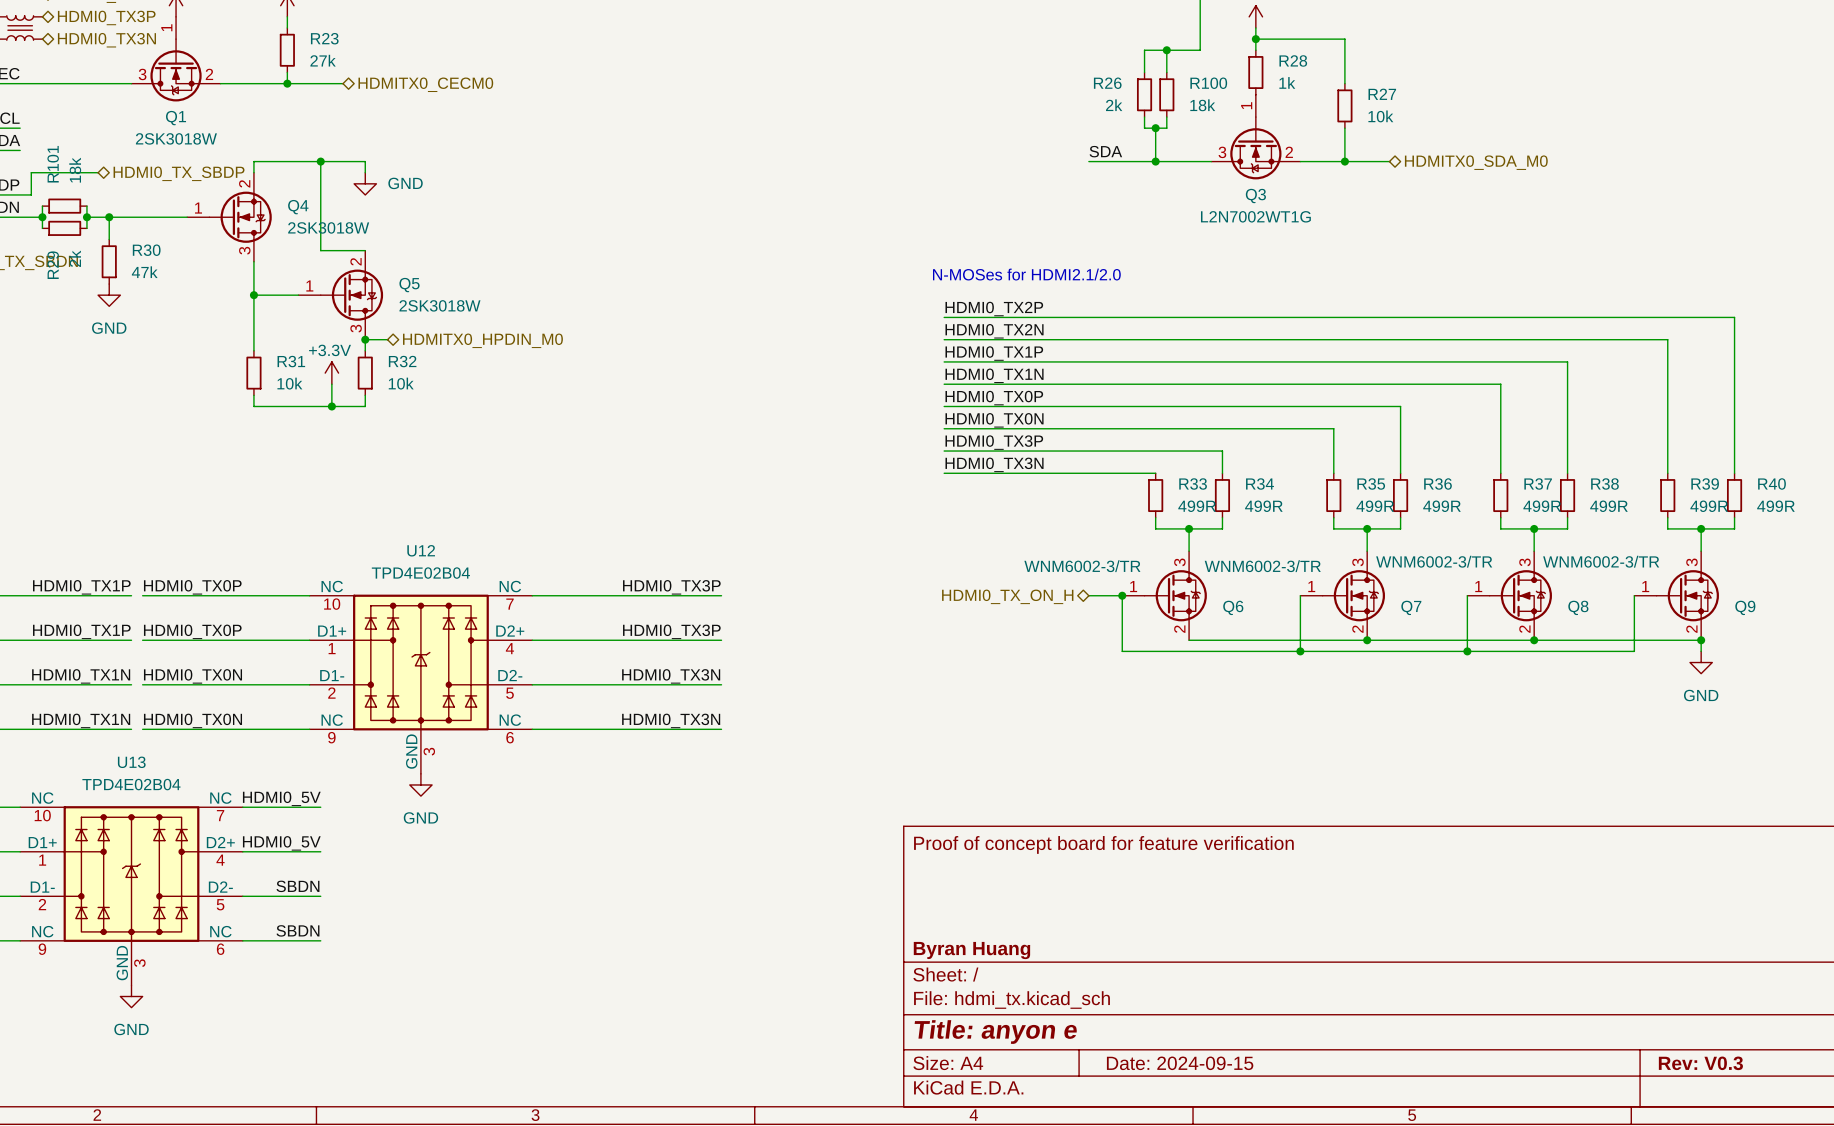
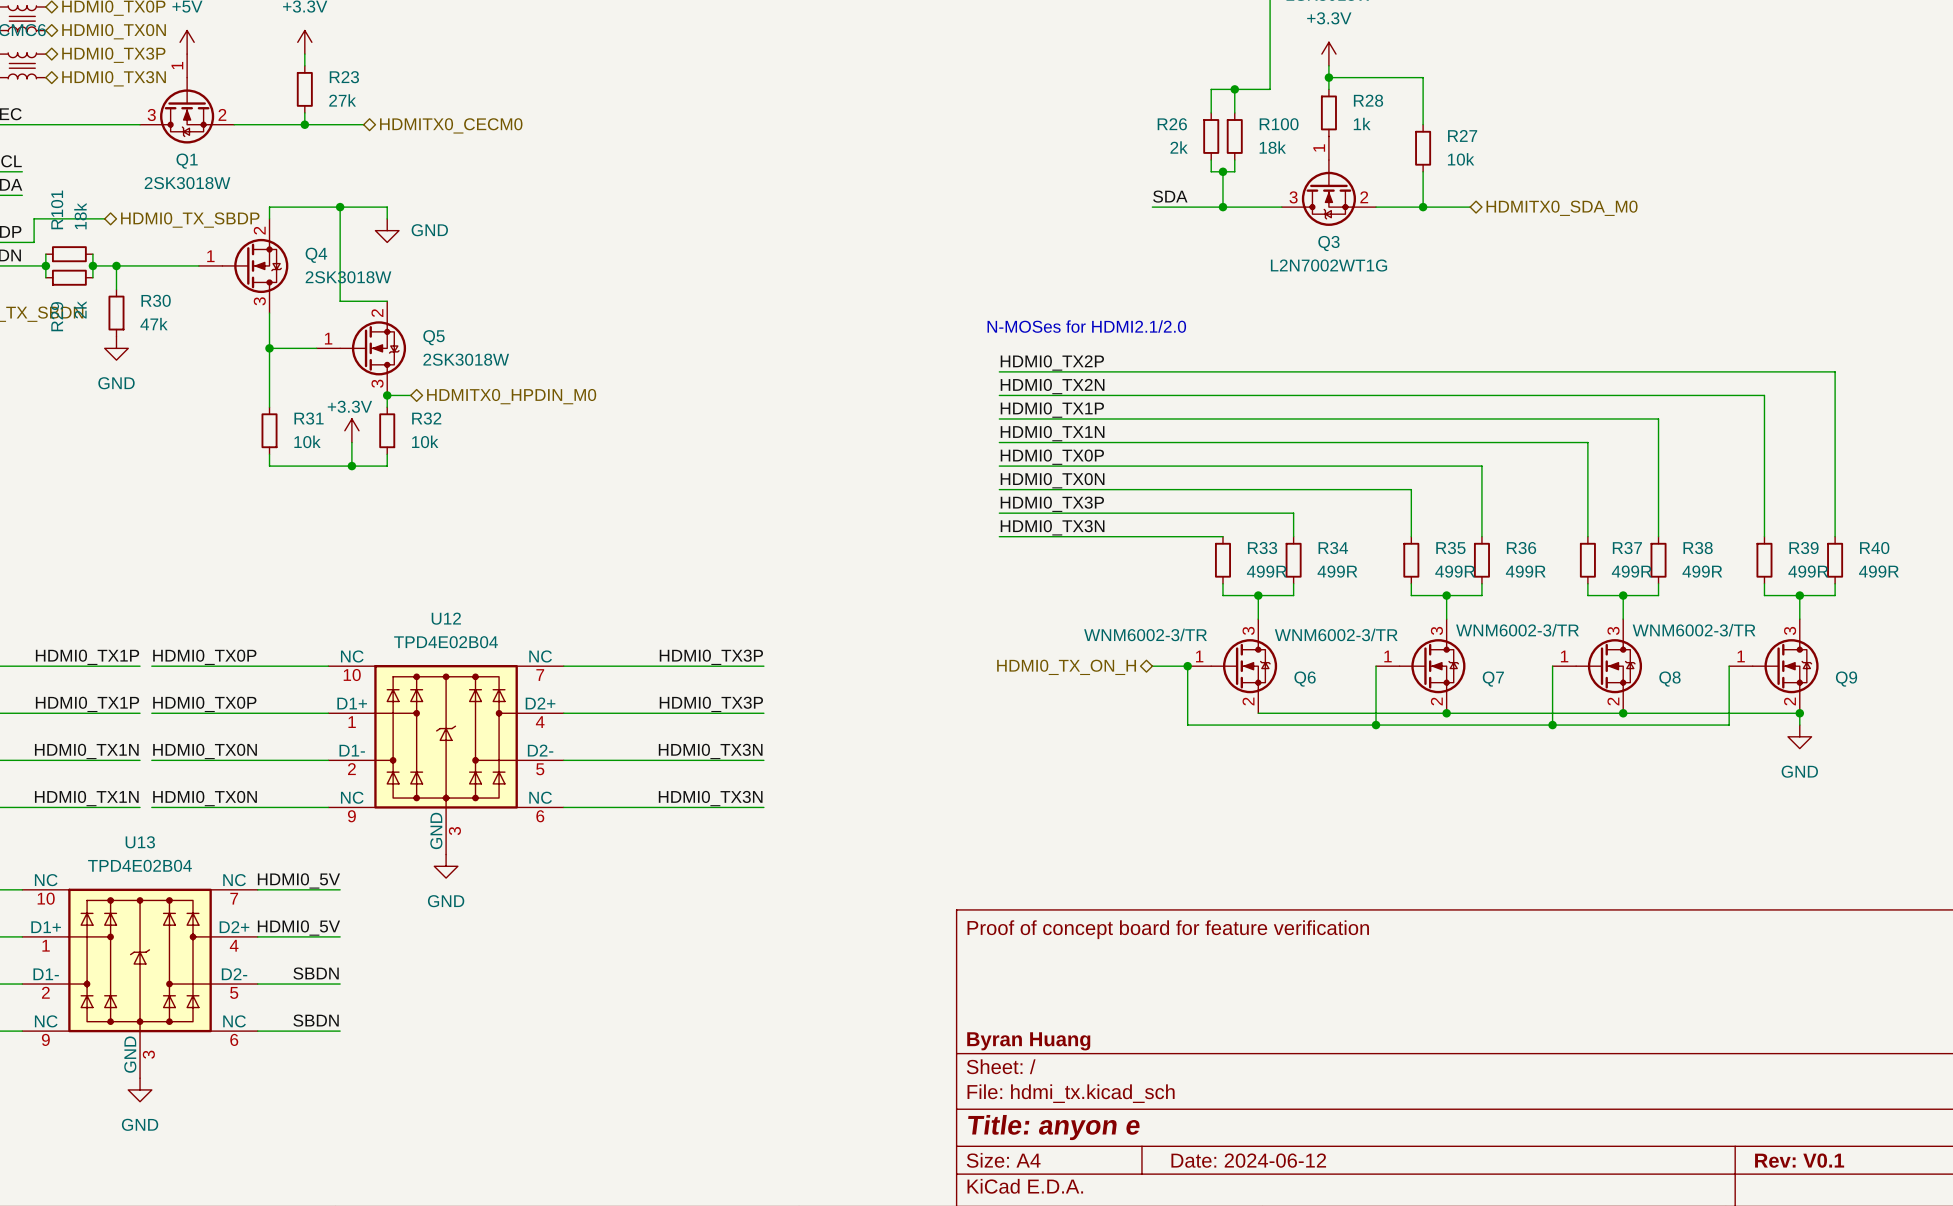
title block: Date: 2024-09-15 (1180, 1063) -> Date: 2024-06-12 (1248, 1160)
title block: Rev: V0.3 (1700, 1063) -> Rev: V0.1 (1799, 1160)

